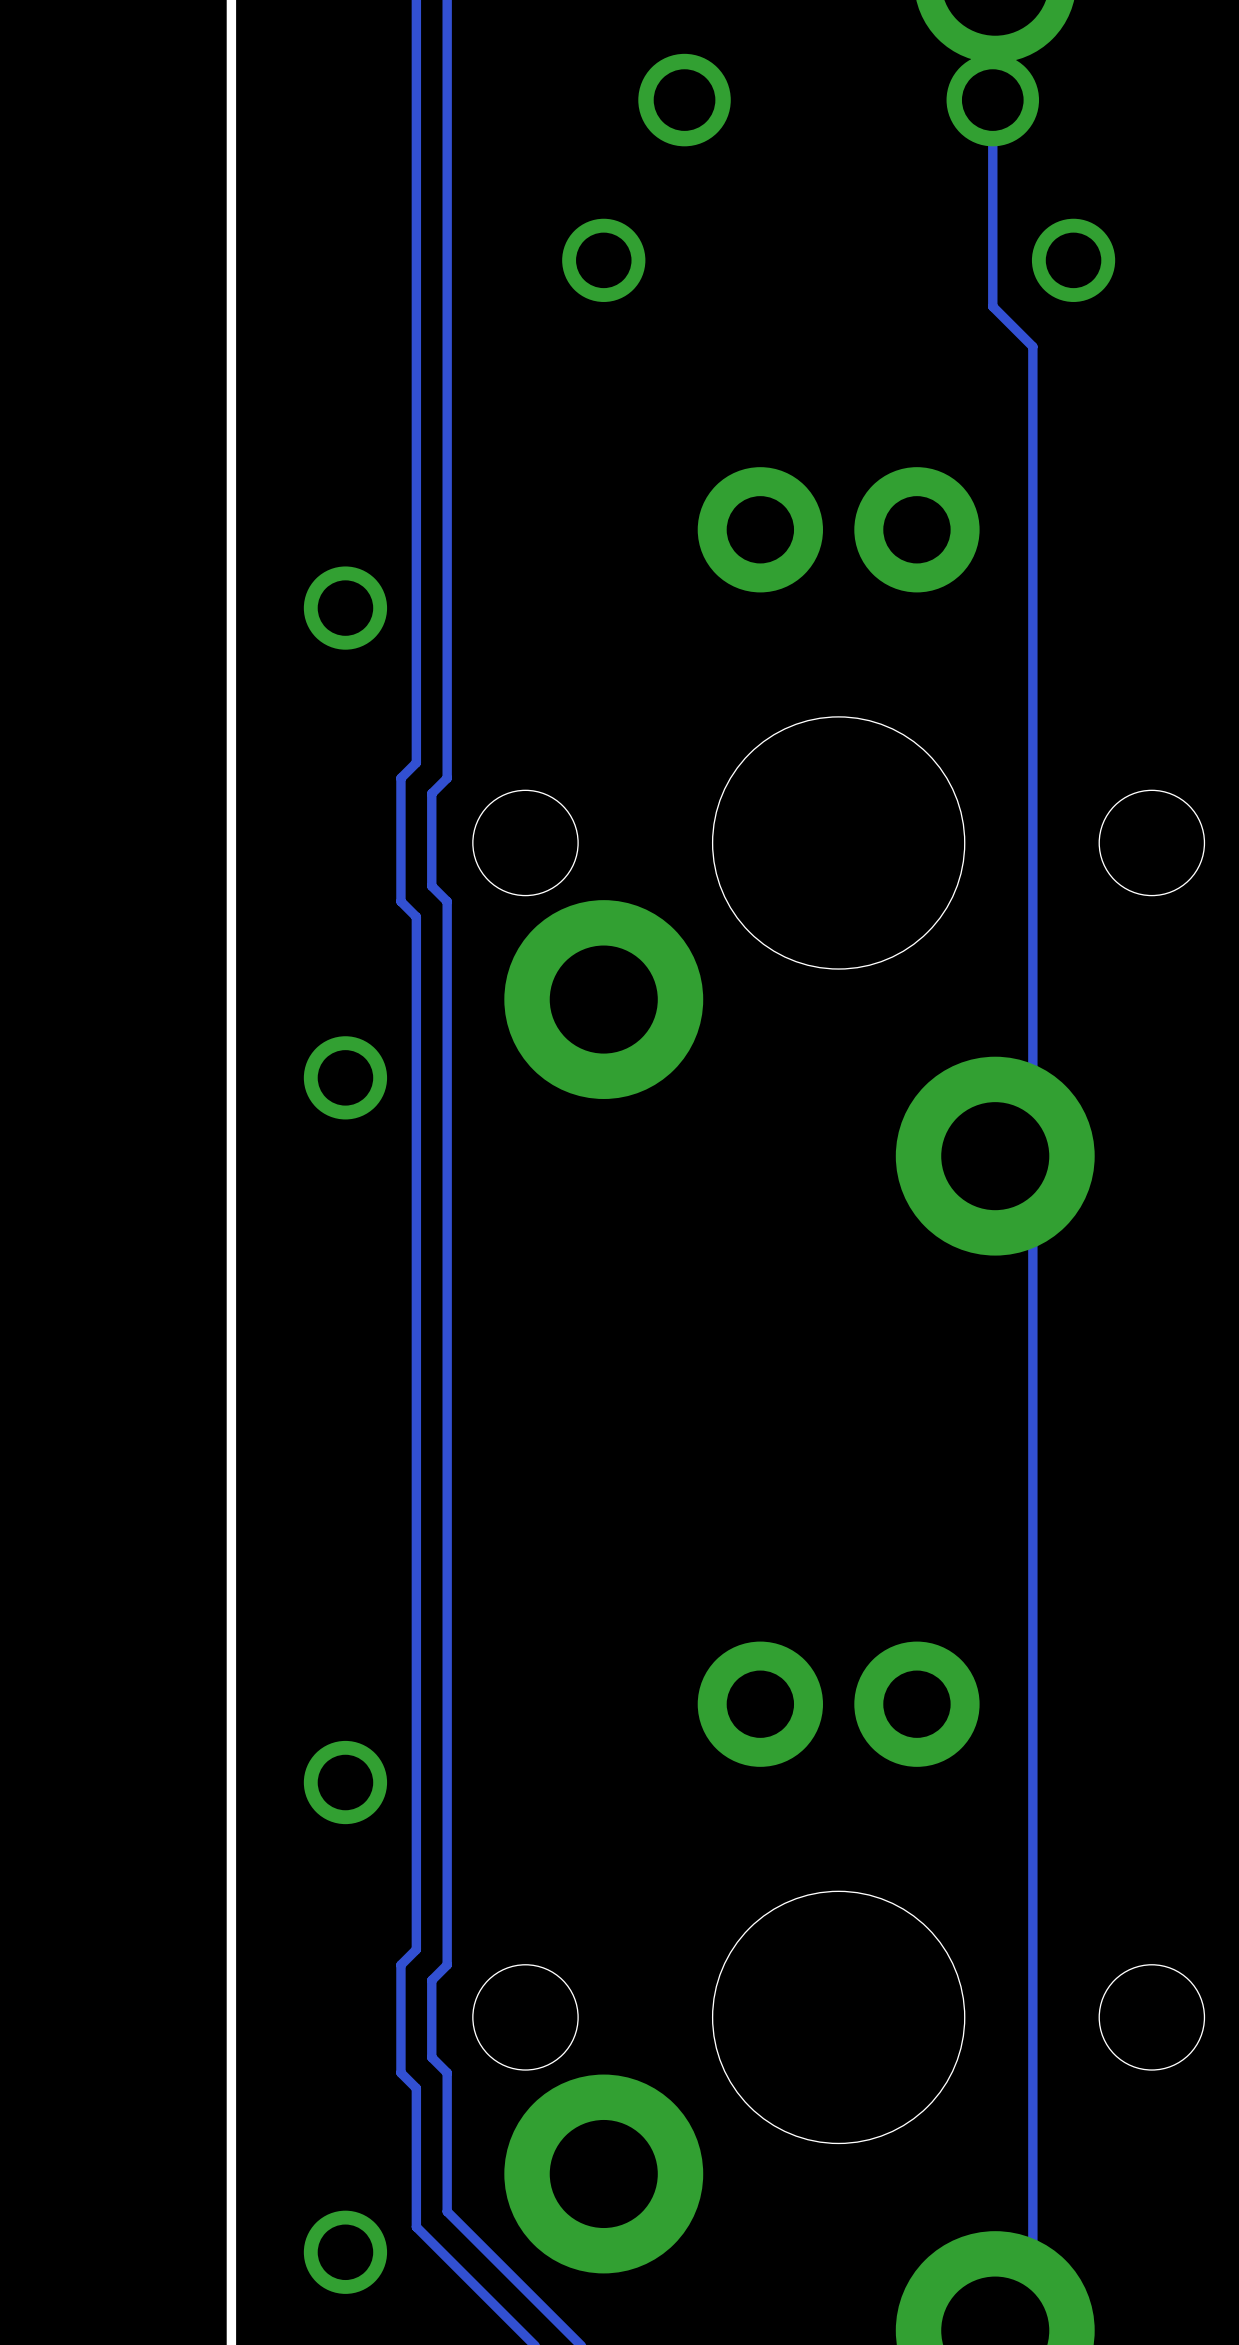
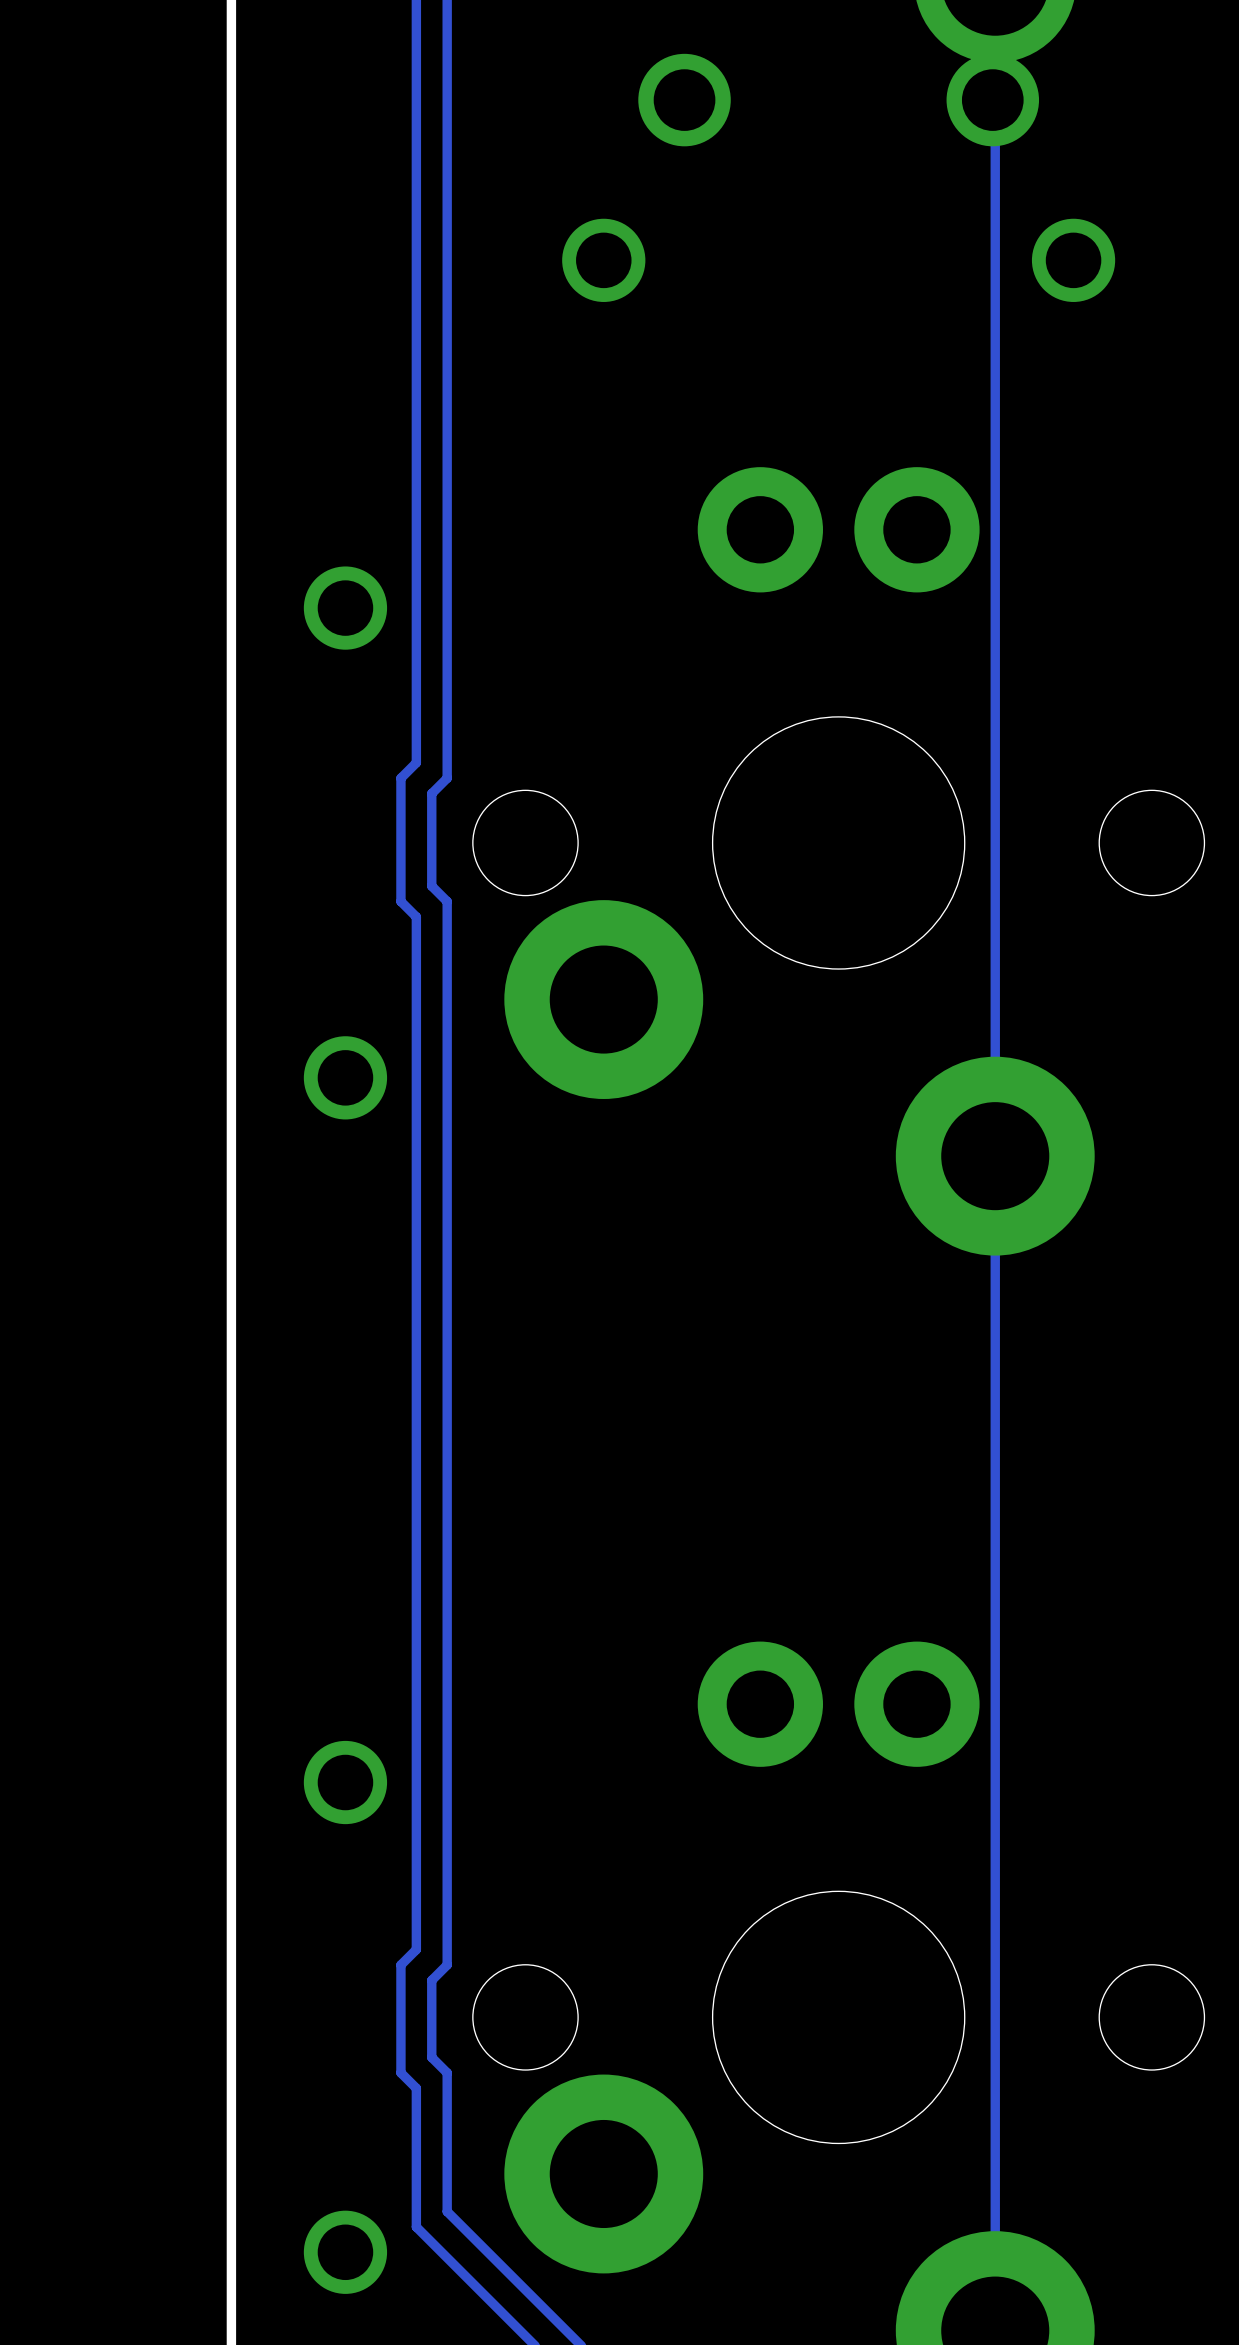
track: (992, 100) (992, 306) (1032, 346) (1032, 1118) (995, 1156) (1032, 1193) (1032, 2292) (995, 2330) -> (992, 100) (995, 102) (995, 2330)

